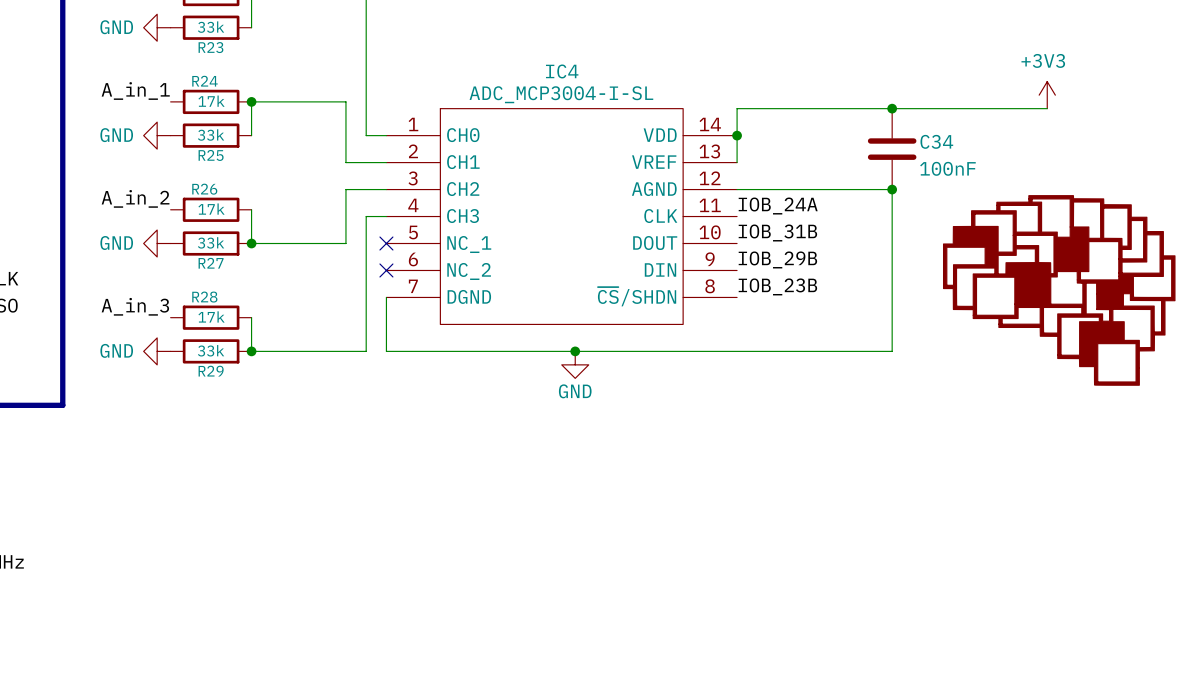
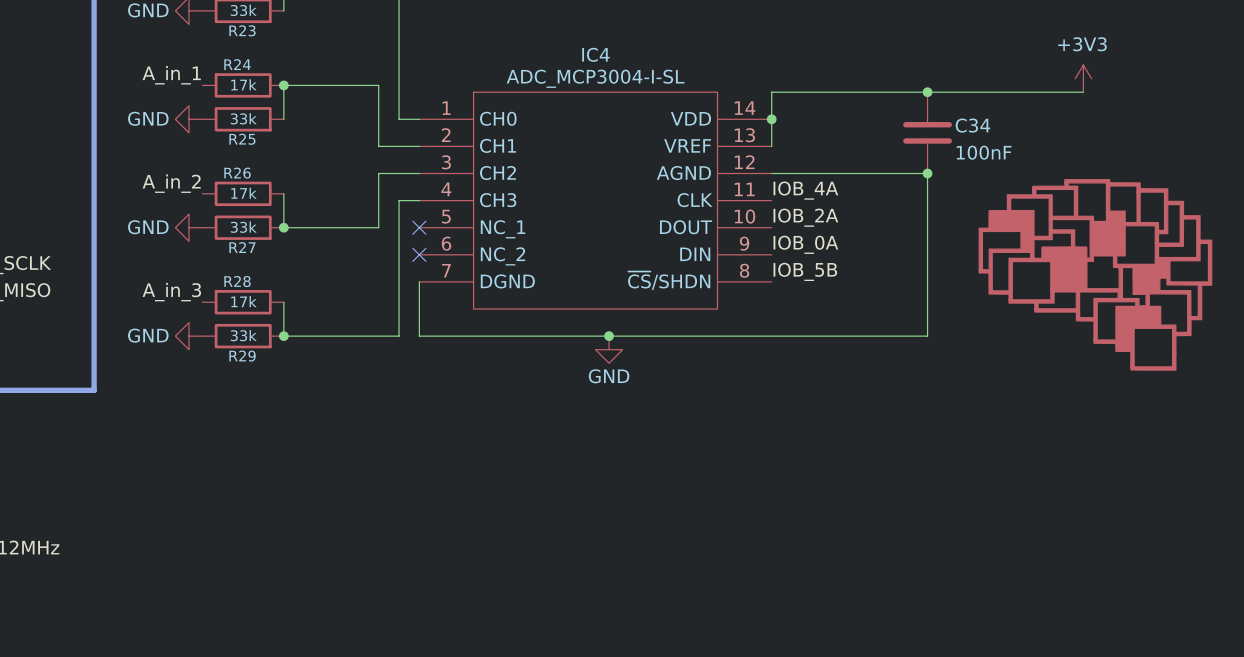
label: IOB_24A (778, 206) -> IOB_4A (805, 190)
label: IOB_31B (777, 232) -> IOB_2A (805, 217)
label: IOB_29B (777, 259) -> IOB_0A (805, 244)
label: IOB_23B (777, 286) -> IOB_5B (805, 271)

